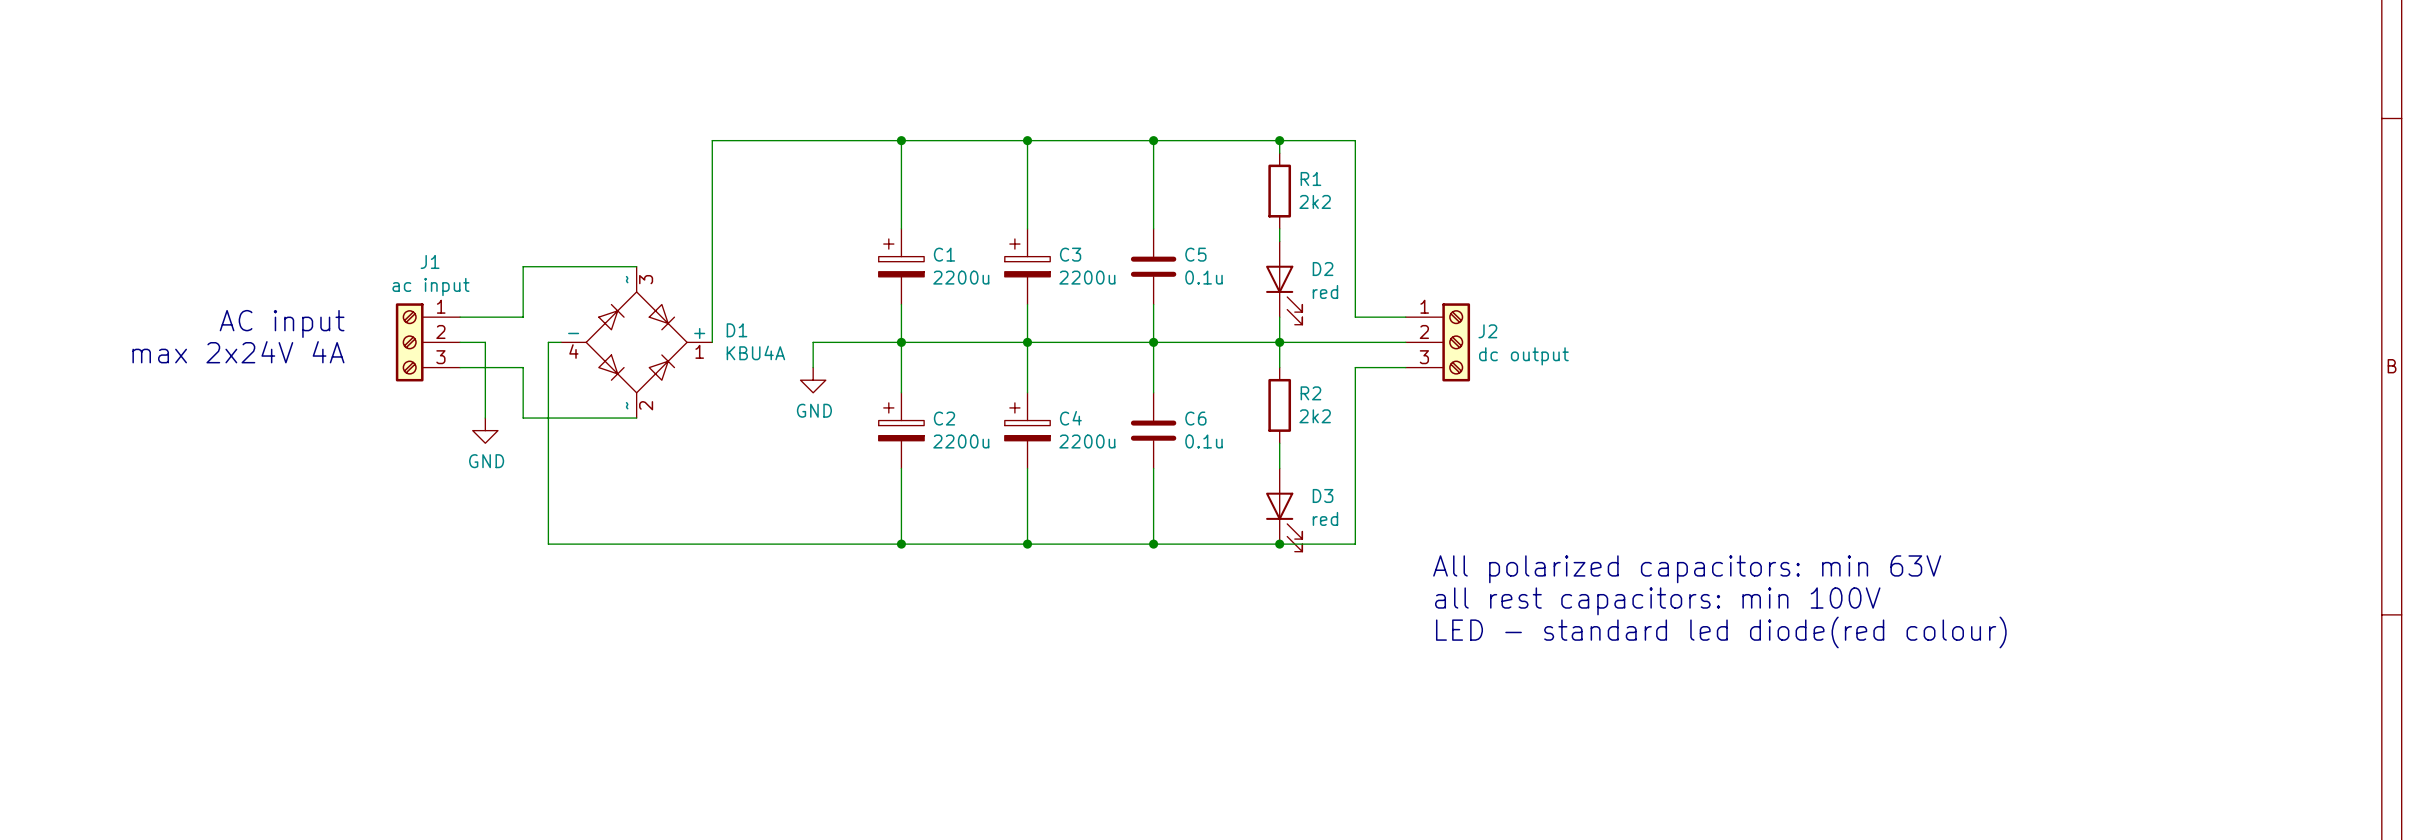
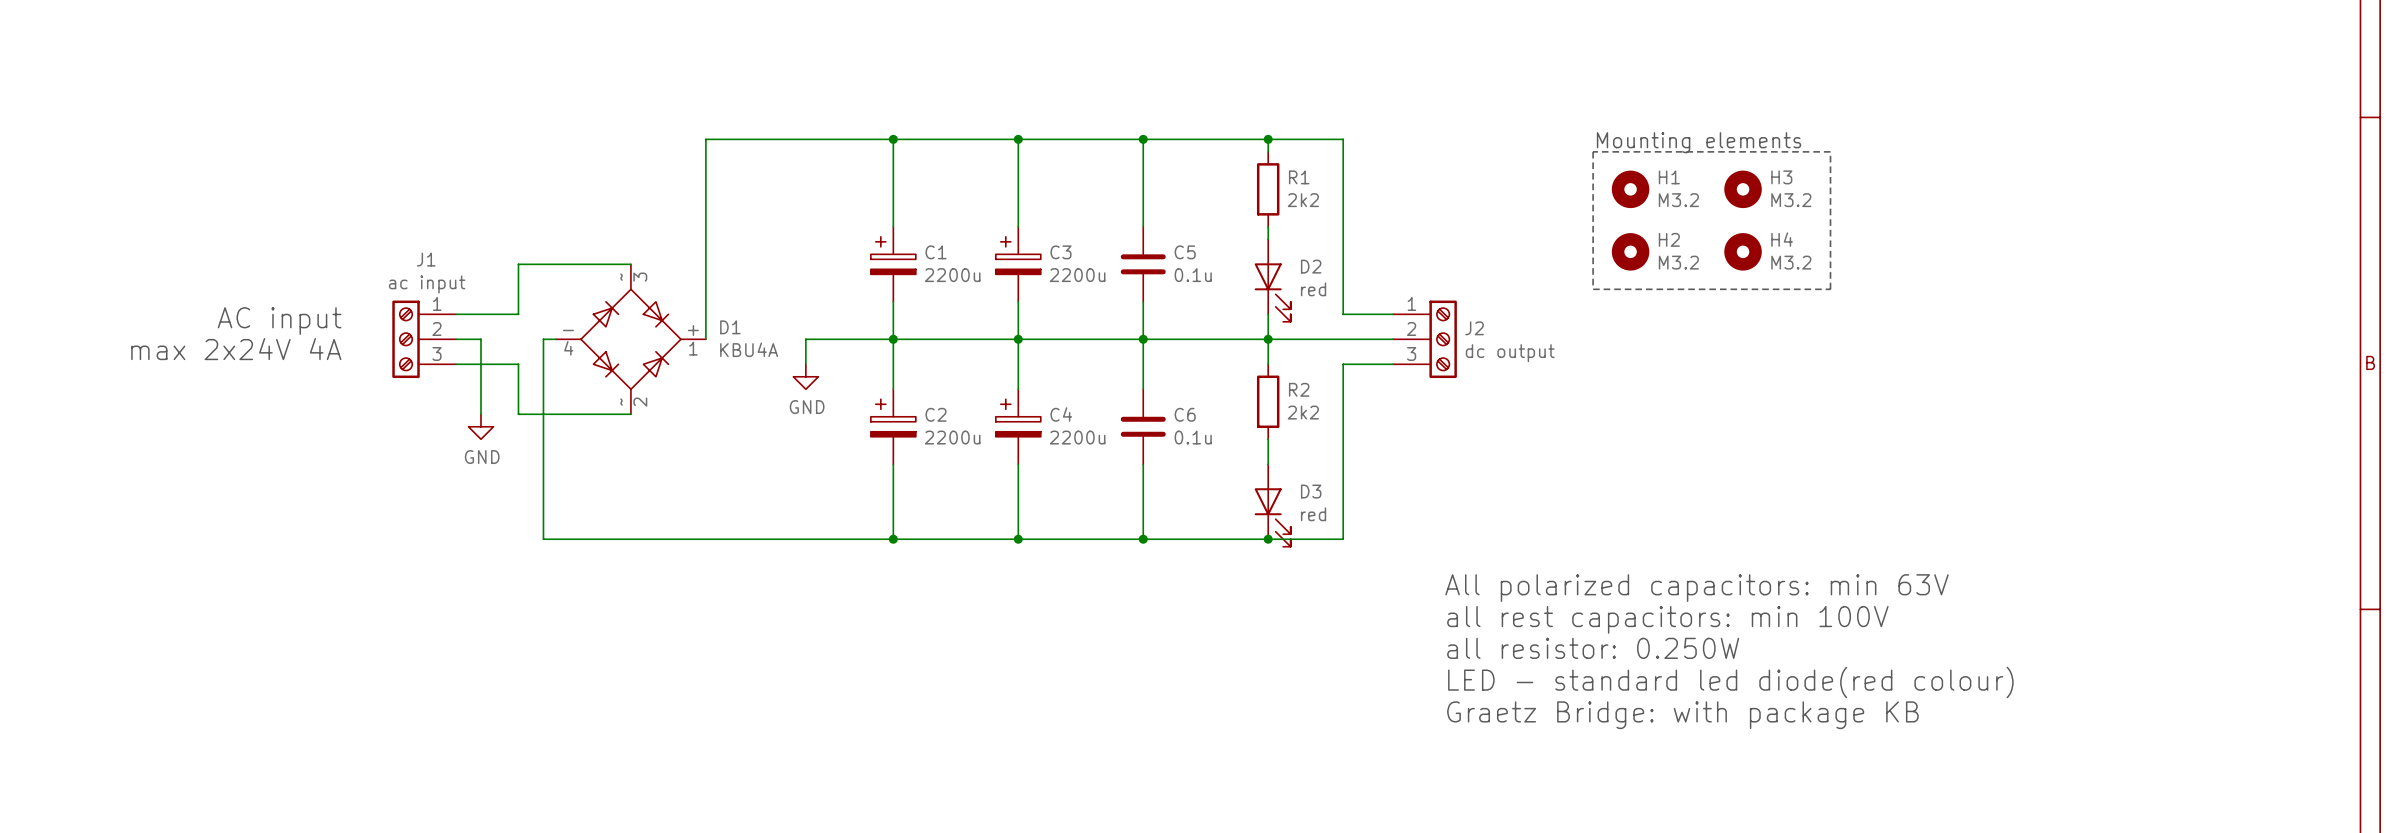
text: none -> Mounting elements (1699, 142)
line: none -> (1593, 151) (1593, 289) (1830, 289) (1830, 151) (1593, 151)
H1: none -> M3.2 (1630, 189)
H3: none -> M3.2 (1743, 189)
H2: none -> M3.2 (1630, 251)
H4: none -> M3.2 (1743, 251)
text position: All polarized capacitors: min 63V (1687, 569) -> All polarized capacitors: min 63V (1697, 588)
text position: all rest capacitors: min 100V (1657, 601) -> all rest capacitors: min 100V (1667, 619)
text position: LED - standard led diode(red colour) (1721, 632) -> LED - standard led diode(red colour) (1730, 682)
text: none -> all resistor: 0.250W (1593, 648)
text: none -> Graetz Bridge: with package KB (1682, 715)

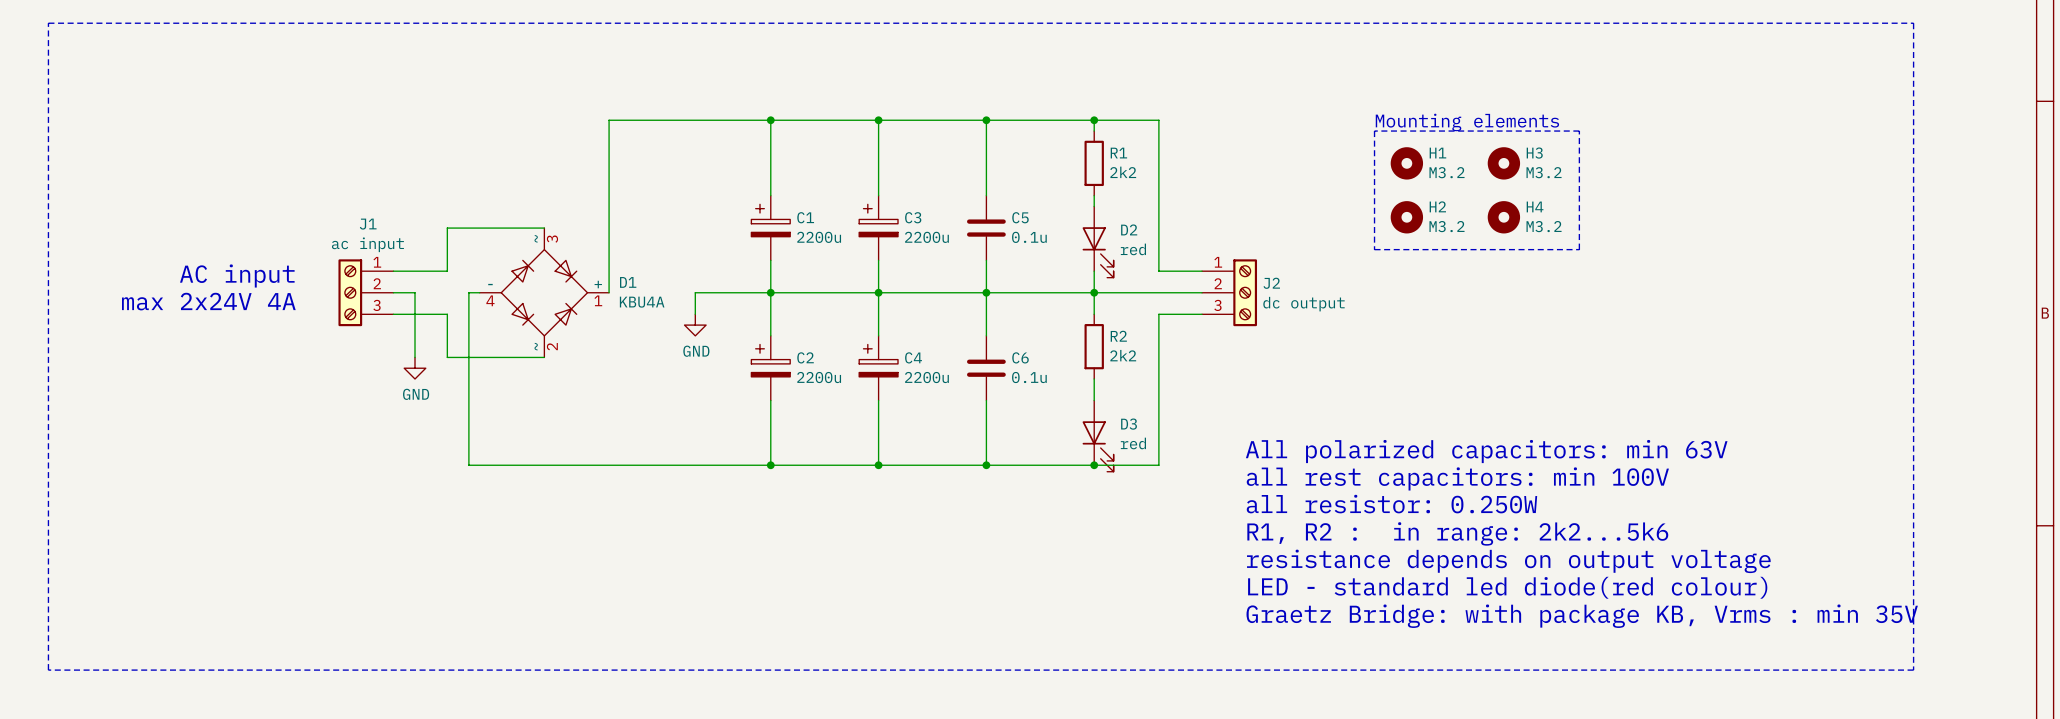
line: none -> (48, 23) (1913, 23) (1913, 670) (48, 670) (48, 23)
text: none -> All polarized capacitors: min 63V (1486, 451)
text: none -> all rest capacitors: min 100V (1457, 478)
text: All polarized capacitors: min 63V (1697, 588) -> all resistor: 0.250W (1391, 504)
text: all rest capacitors: min 100V (1667, 619) -> R1, R2 : in range: 2k2...5k6 (1457, 533)
text: all resistor: 0.250W (1593, 648) -> resistance depends on output voltage (1508, 561)
text: Graetz Bridge: with package KB (1682, 715) -> Graetz Bridge: with package KB, Vrms : min 35V (1582, 616)

